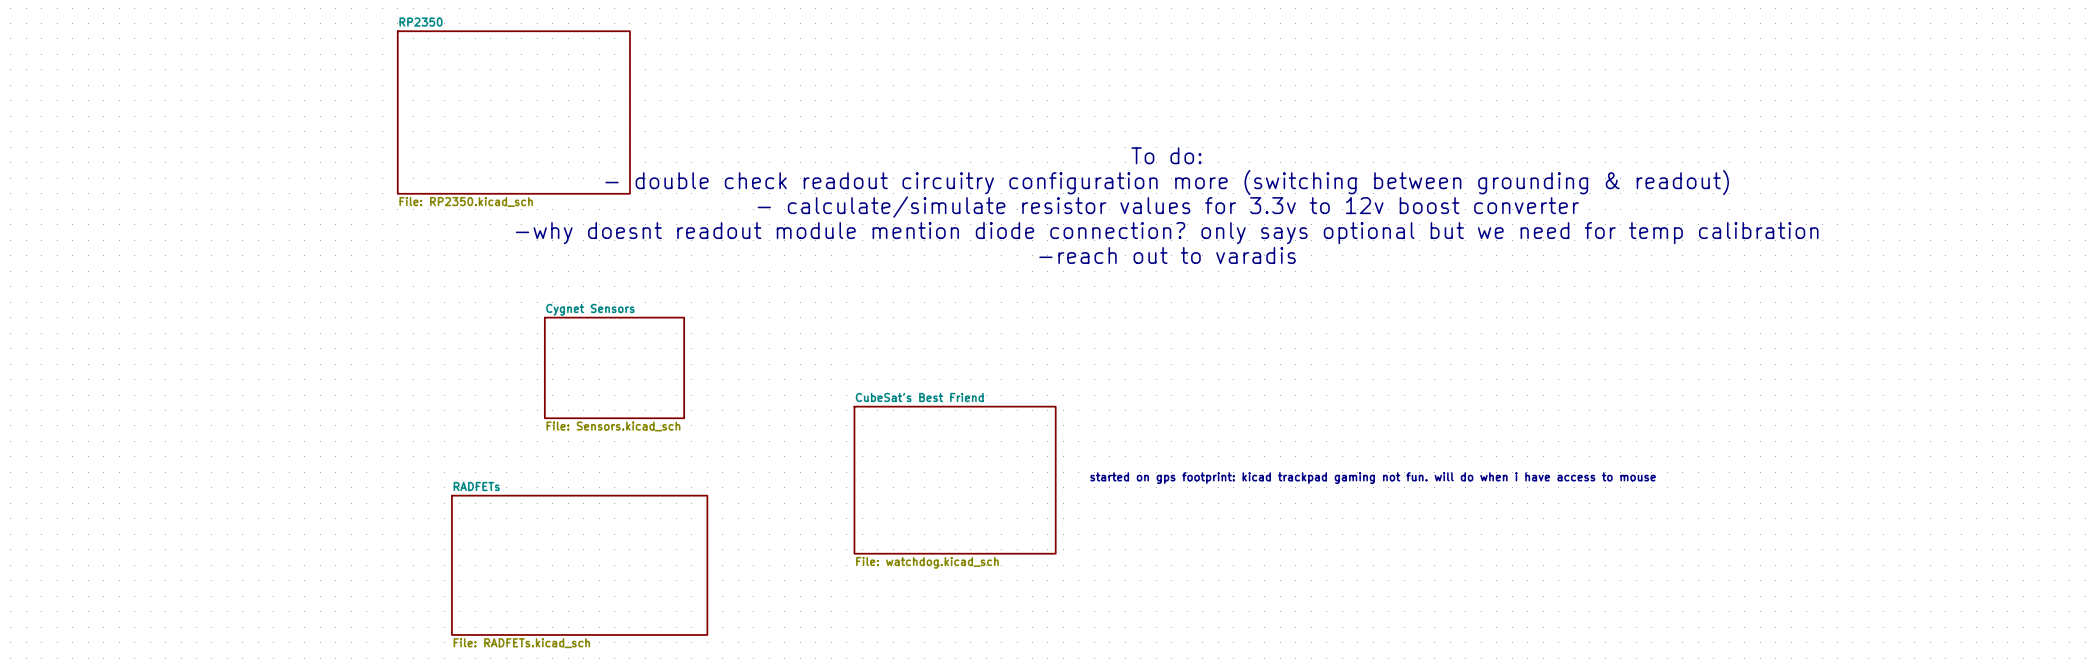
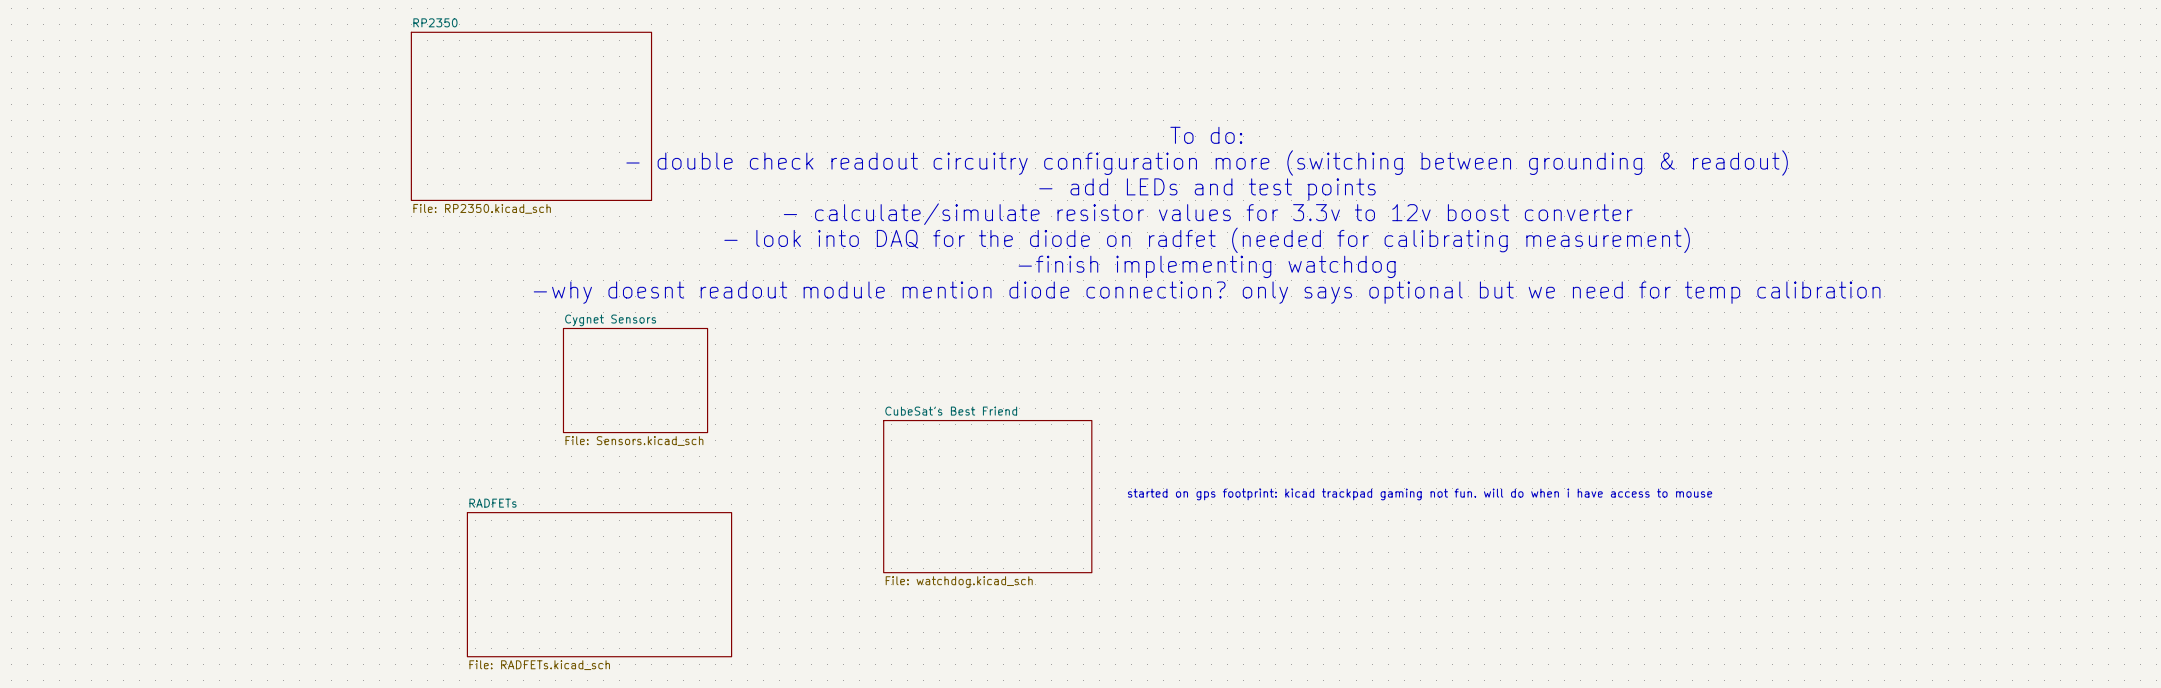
text: none -> To do: (1206, 135)
text: To do: (1166, 155) -> - double check readout circuitry configuration more (switching between grounding & readout) (1207, 163)
text: - double check readout circuitry configuration more (switching between grounding & readout) (1167, 182) -> - add LEDs and test points (1207, 189)
text: -why doesnt readout module mention diode connection? only says optional but we need for temp calibration (1167, 233) -> - look into DAQ for the diode on radfet (needed for calibrating measurement) (1207, 240)
text: -reach out to varadis (1167, 255) -> -finish implementing watchdog (1207, 266)
text: none -> -why doesnt readout module mention diode connection? only says optional but we need for temp calibration (1207, 292)

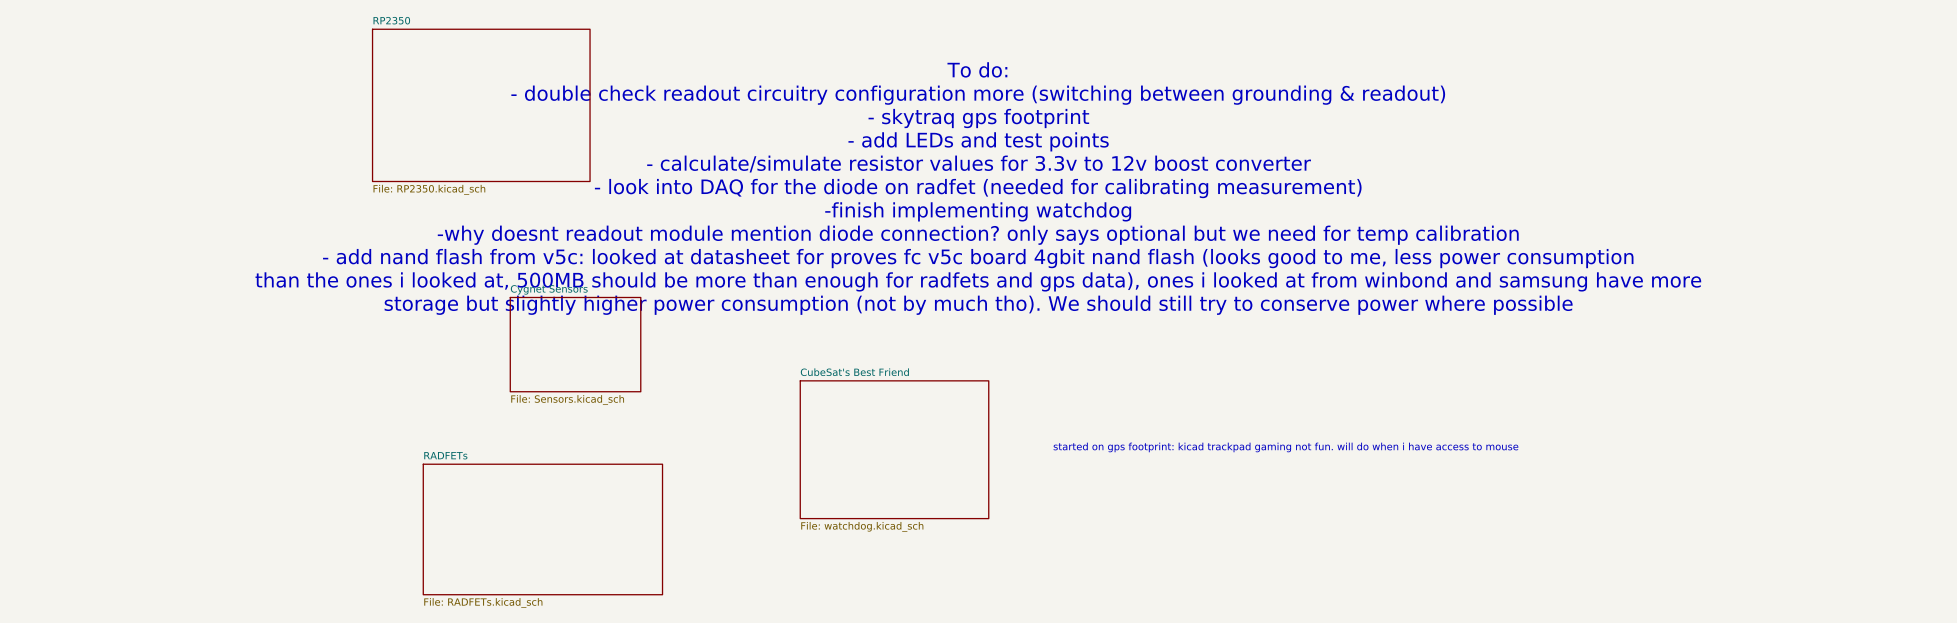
text: none -> - skytraq gps footprint (978, 118)
text position: To do: (1206, 135) -> To do: (977, 69)
text position: - double check readout circuitry configuration more (switching between grounding & readout) (1207, 163) -> - double check readout circuitry configuration more (switching between grounding & readout) (978, 95)
text position: - add LEDs and test points (1207, 189) -> - add LEDs and test points (978, 141)
text position: - calculate/simulate resistor values for 3.3v to 12v boost converter (1208, 214) -> - calculate/simulate resistor values for 3.3v to 12v boost converter (979, 164)
text position: - look into DAQ for the diode on radfet (needed for calibrating measurement) (1207, 240) -> - look into DAQ for the diode on radfet (needed for calibrating measurement) (978, 188)
text position: -finish implementing watchdog (1207, 266) -> -finish implementing watchdog (978, 211)
text: none -> - add nand flash from v5c: looked at datasheet for proves fc v5c board 4gbit nand flash (looks good to me, less power consumption (978, 258)
text position: -why doesnt readout module mention diode connection? only says optional but we need for temp calibration (1207, 292) -> -why doesnt readout module mention diode connection? only says optional but we need for temp calibration (978, 235)
text: none -> than the ones i looked at, 500MB should be more than enough for radfets and gps data), ones i looked at from winbond and samsung have more (978, 281)
text: none -> storage but slightly higher power consumption (not by much tho). We should still try to conserve power where possible (978, 305)

